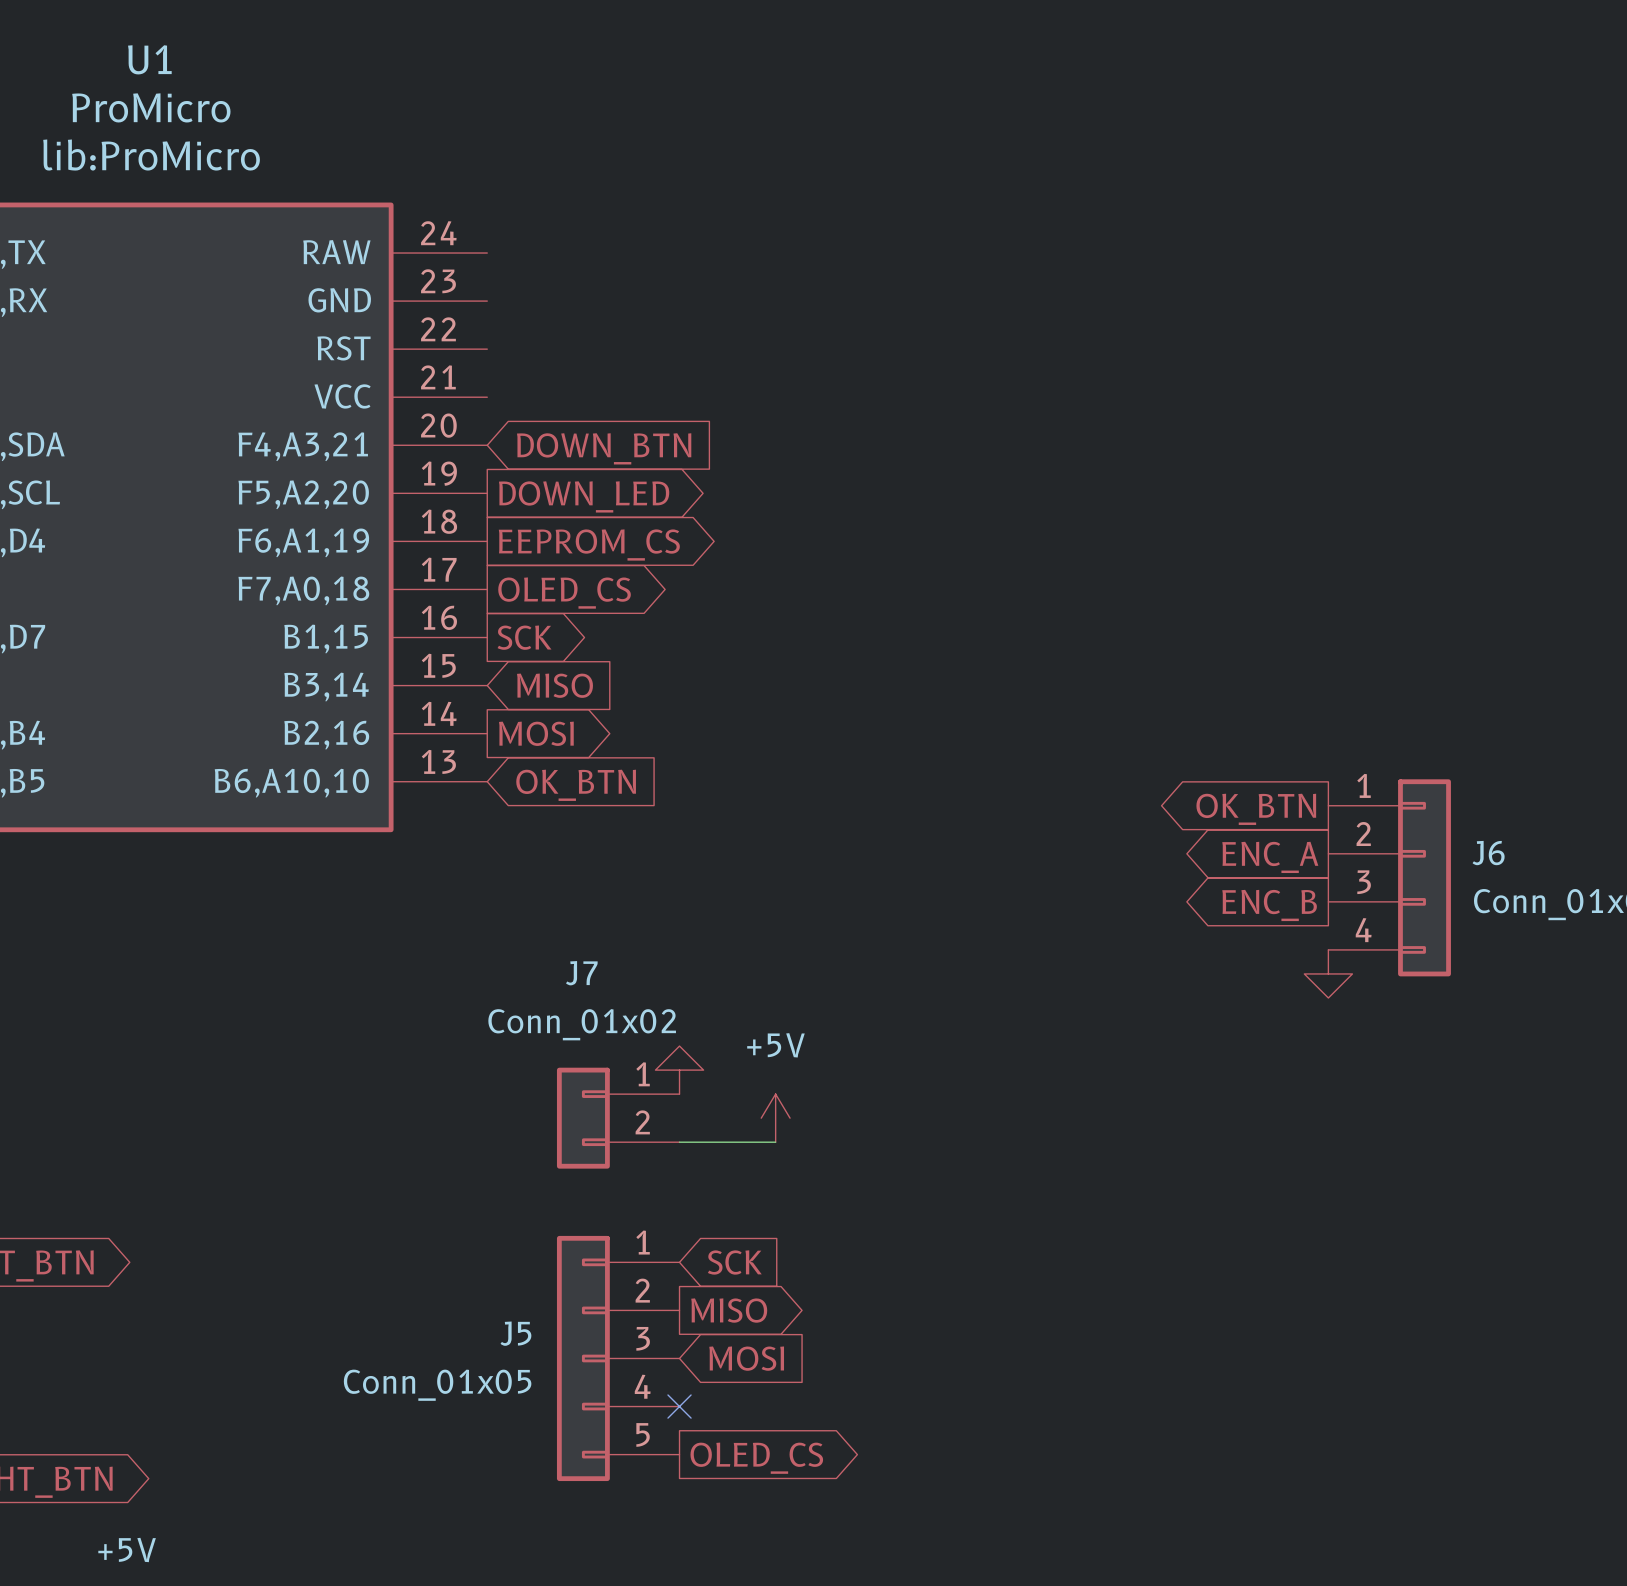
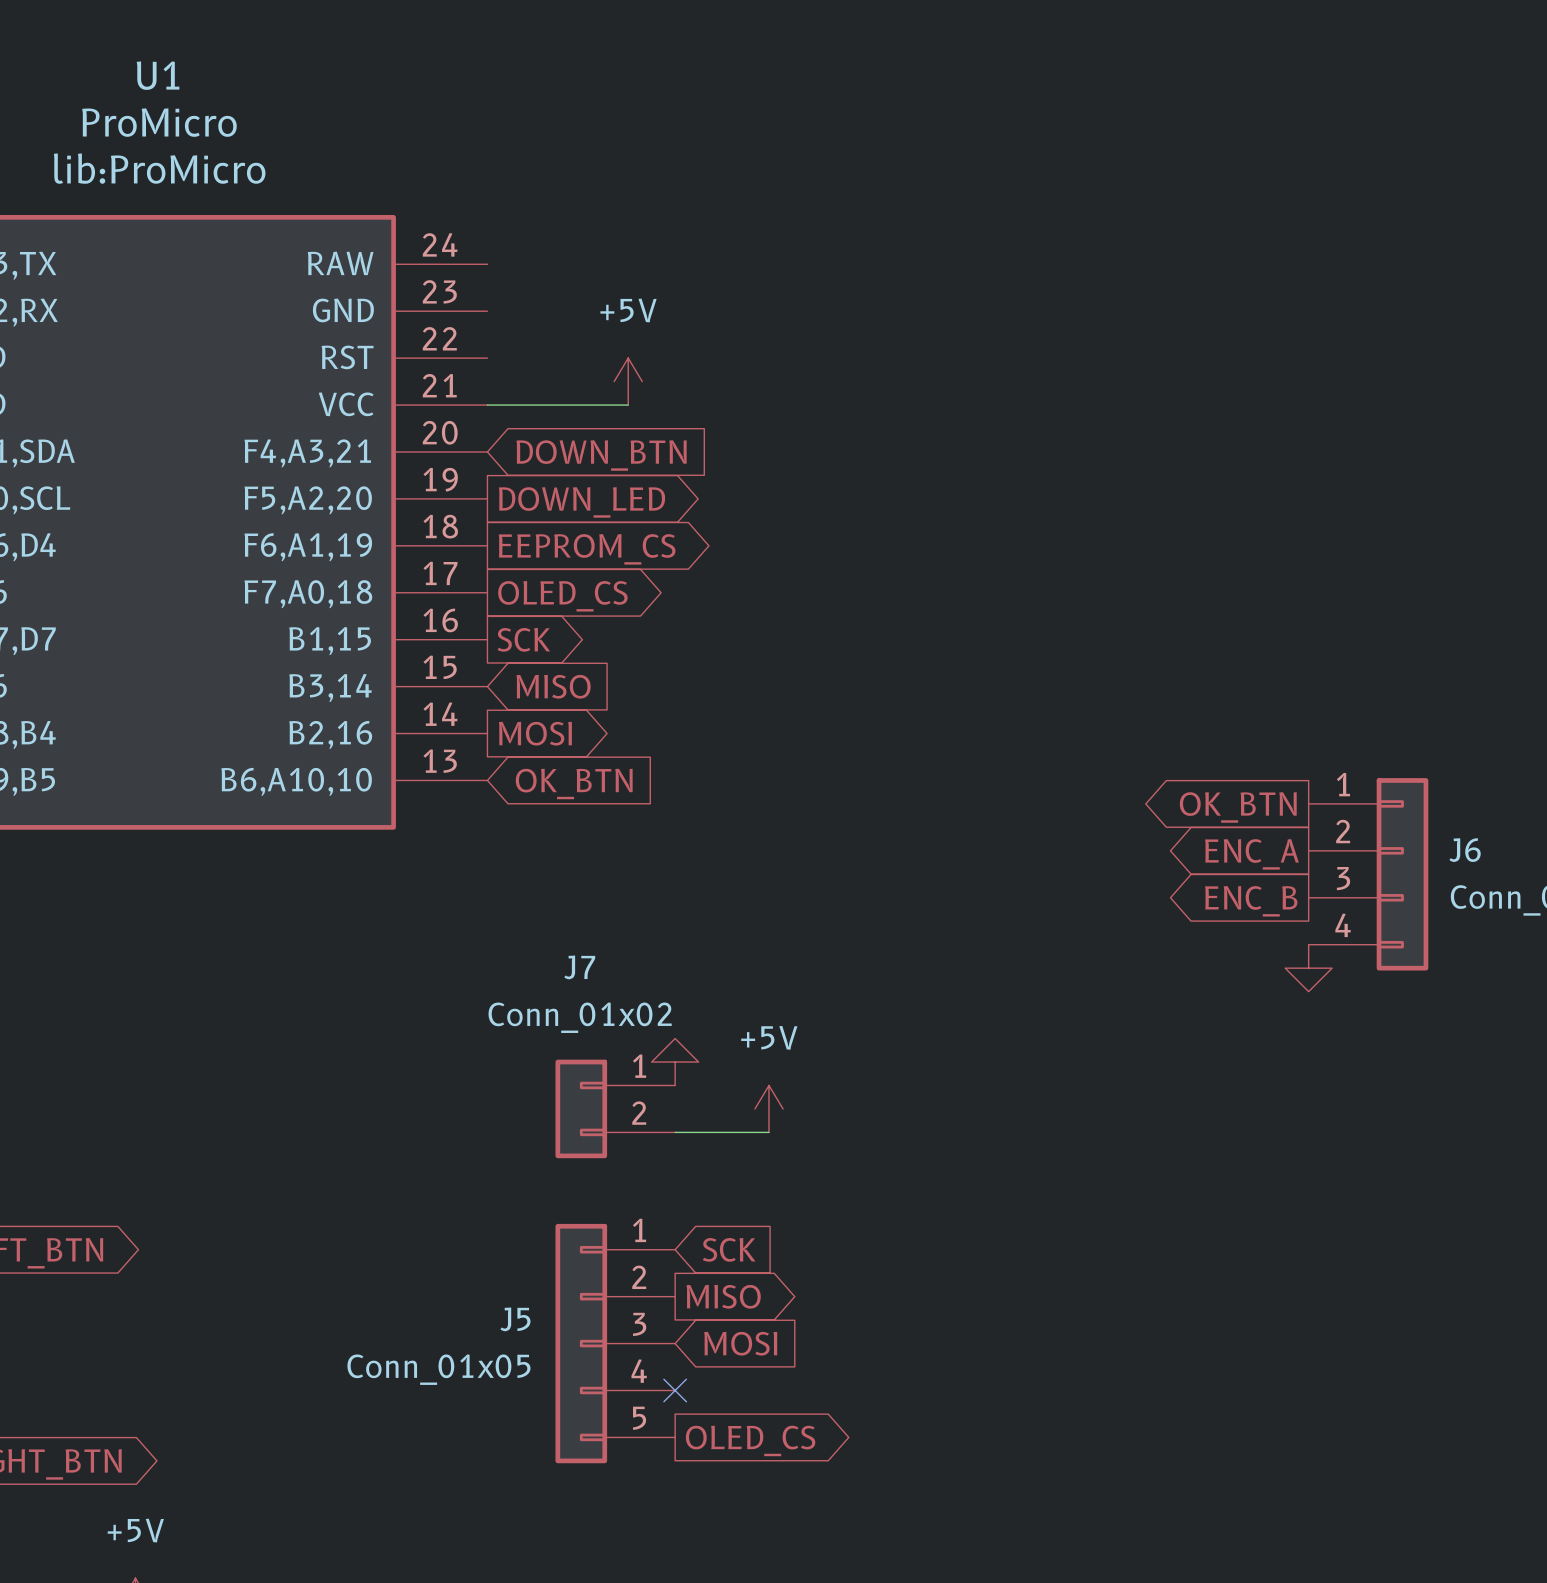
power symbol: none -> +5V (628, 381)
wire: none -> (487, 405) (628, 405)

